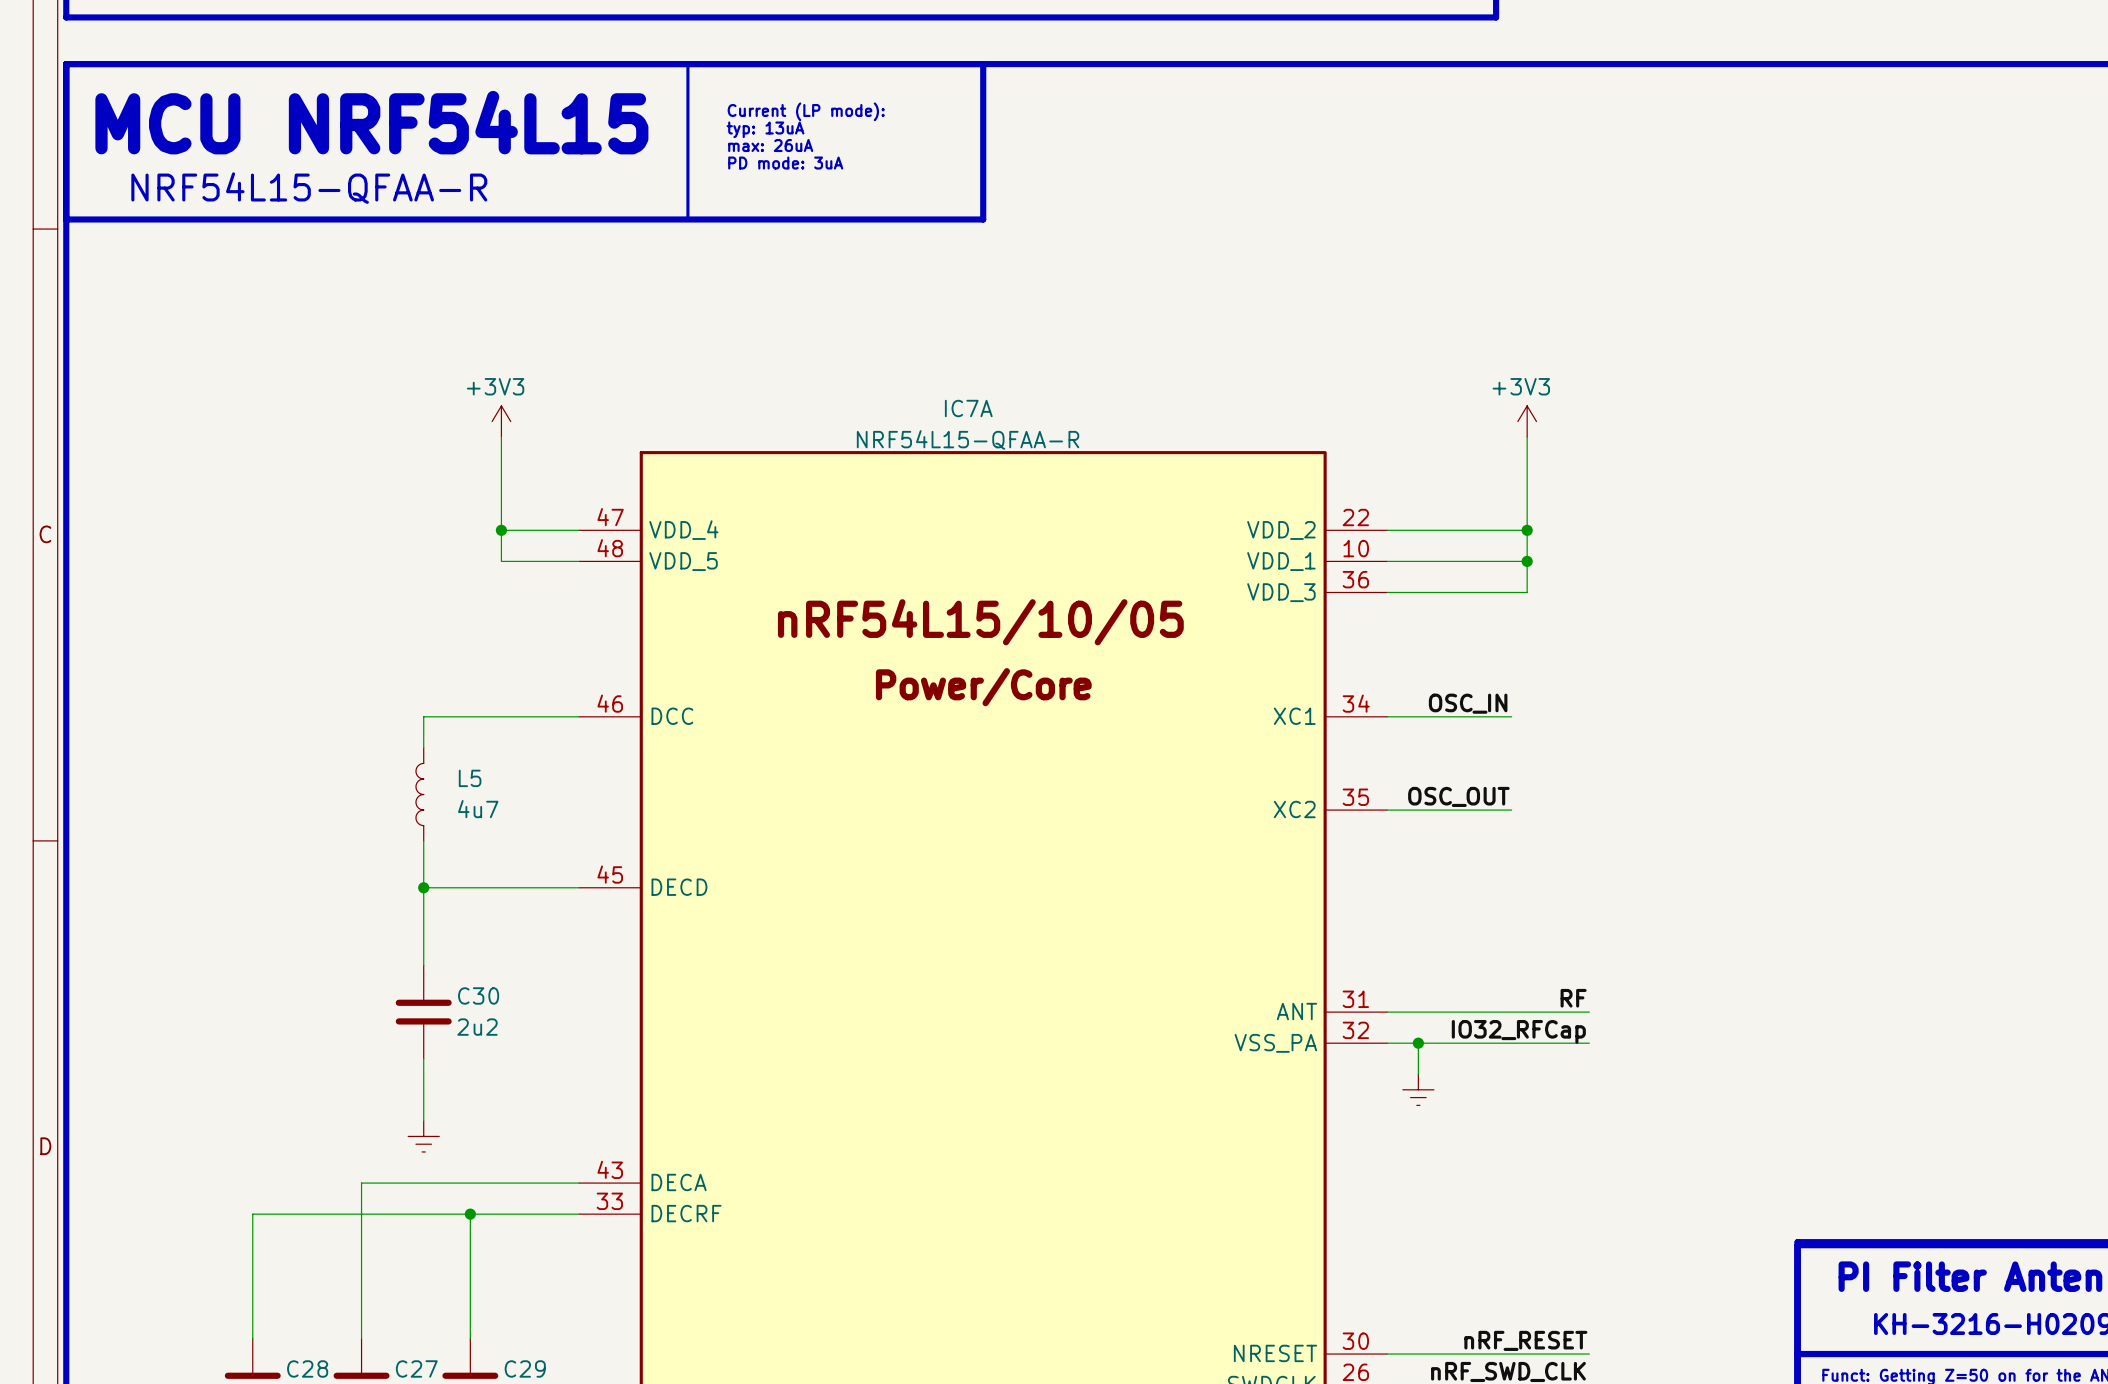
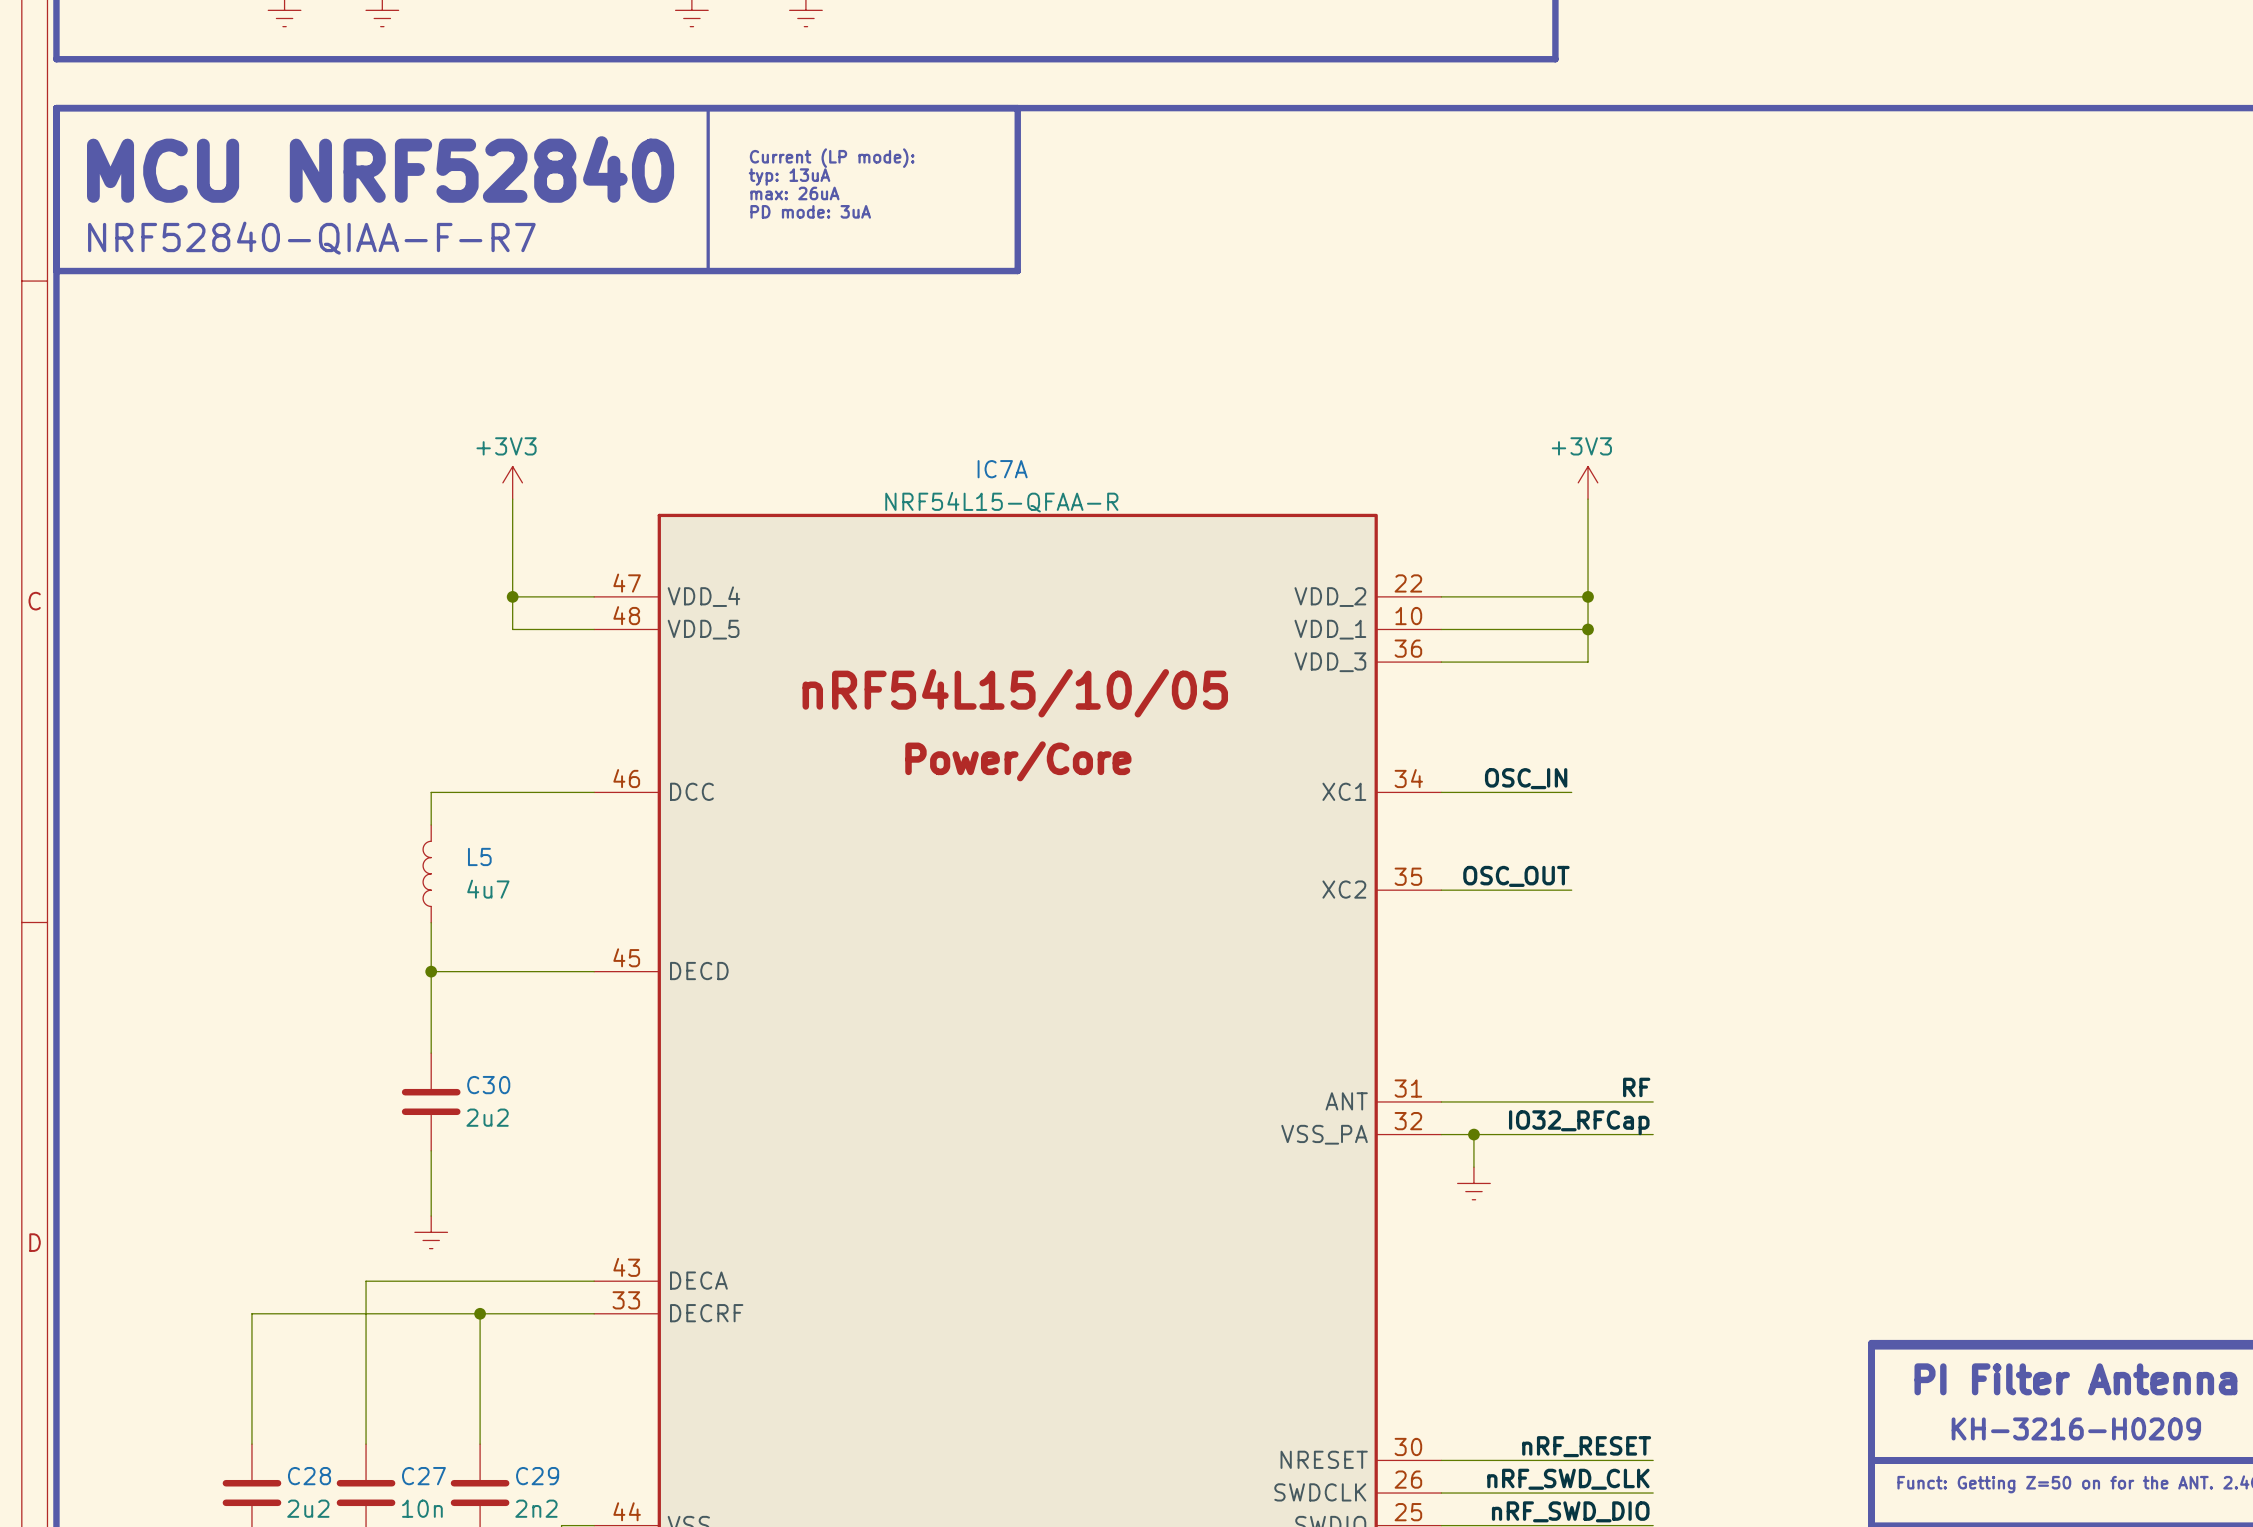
text: MCU NRF54L15 (371, 122) -> MCU NRF52840 (380, 169)
text: NRF54L15-QFAA-R (309, 188) -> NRF52840-QIAA-F-R7 (311, 238)

